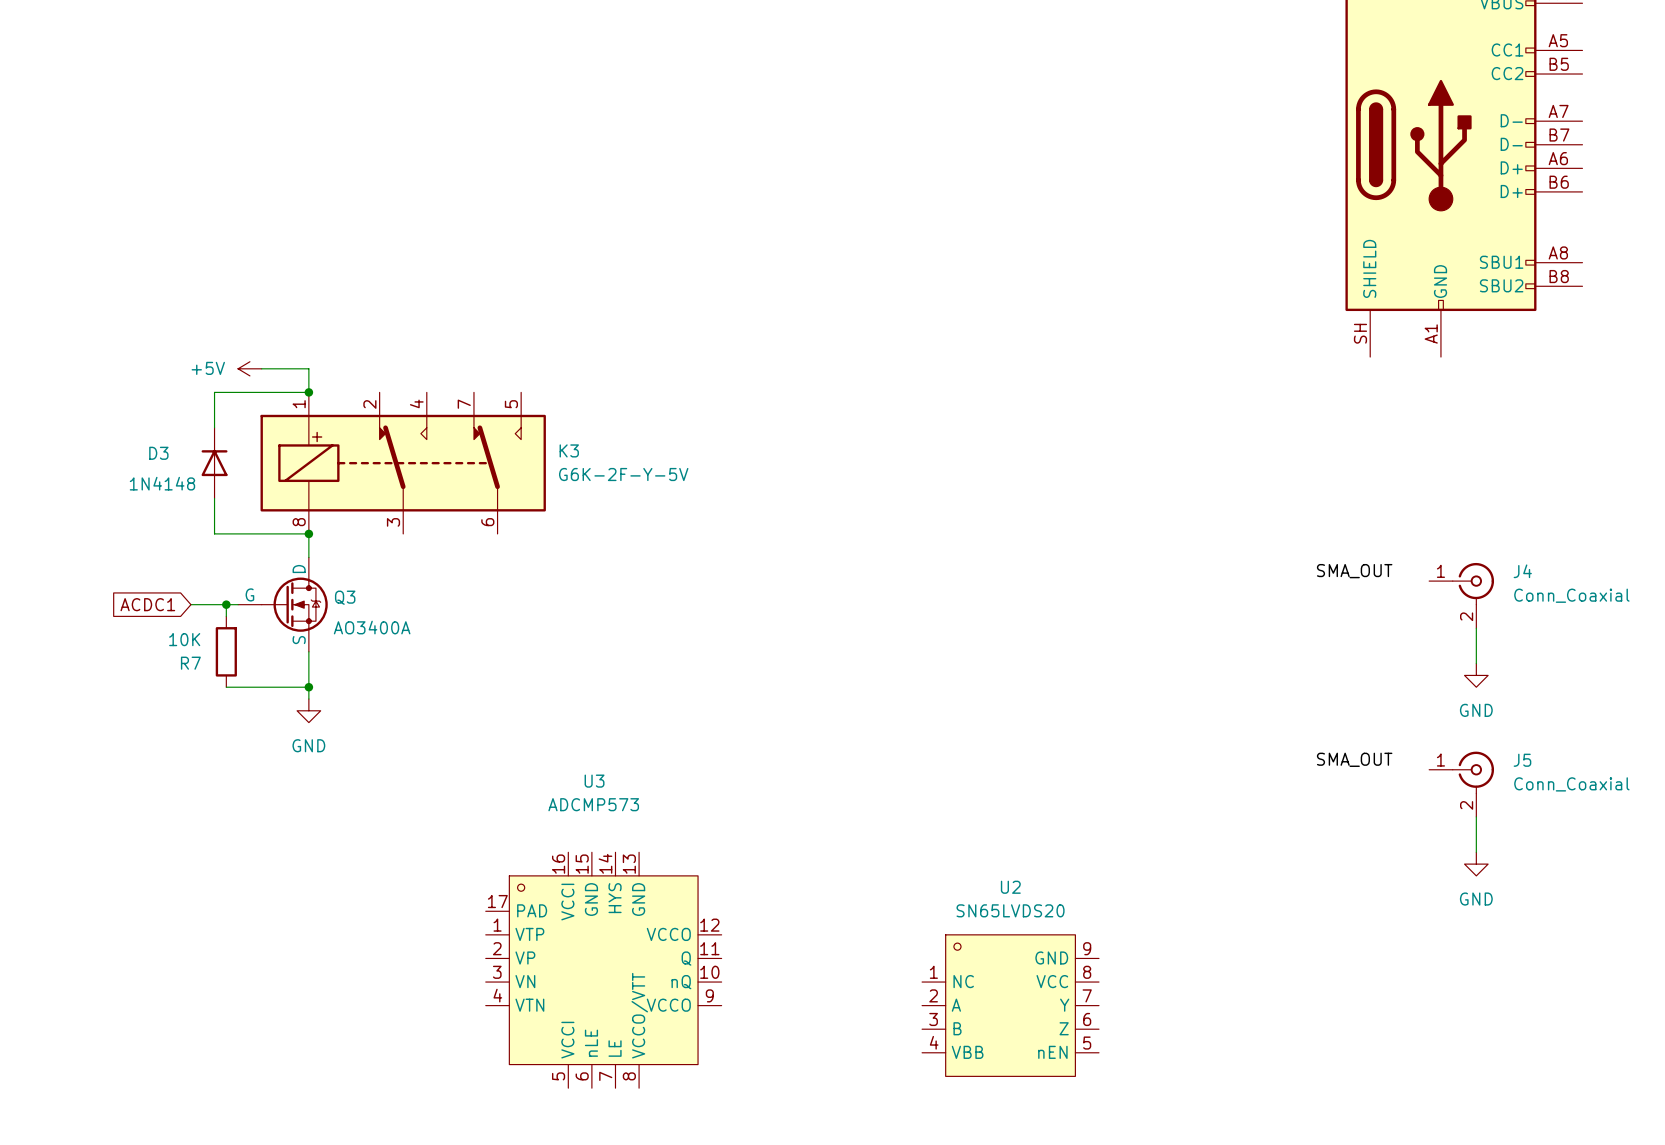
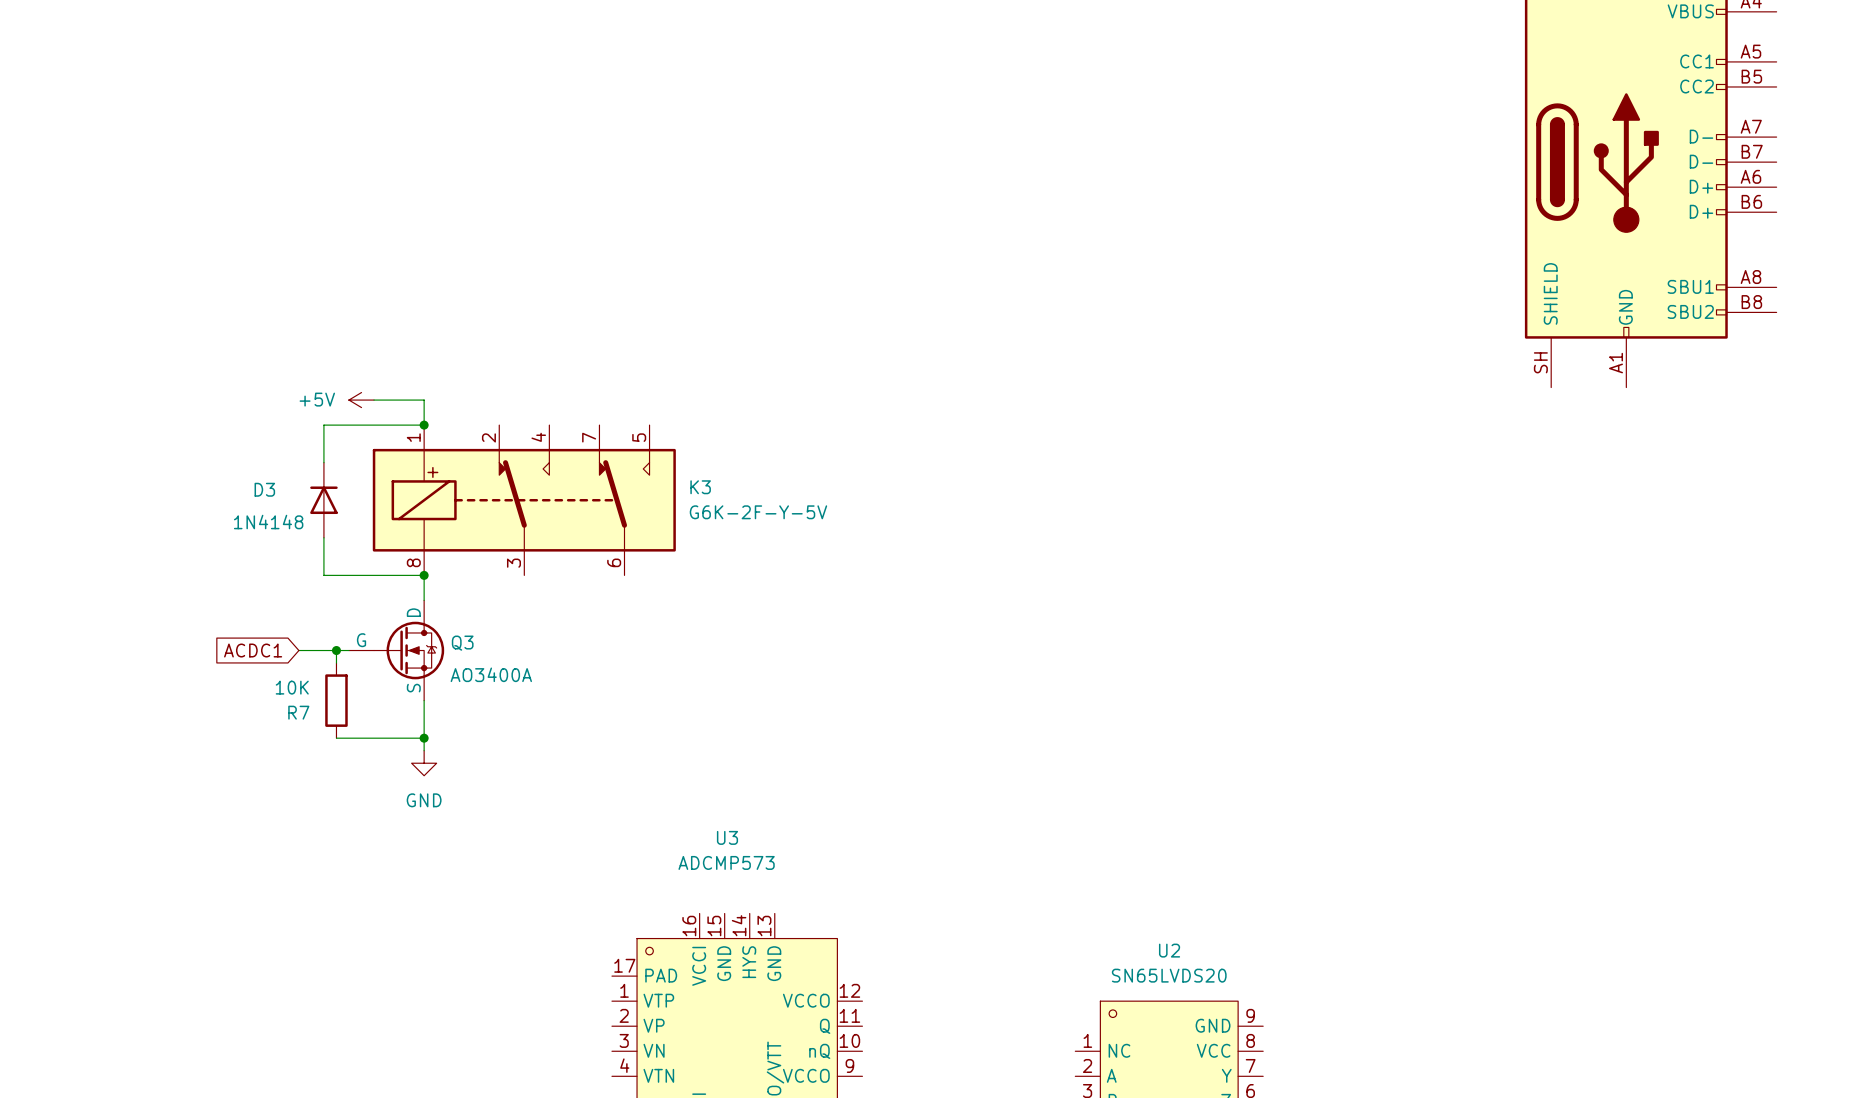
label: SMA_OUT (1354, 571) -> none
J4: Conn_Coaxial (1461, 595) -> none
wire: (1476, 628) (1476, 663) -> none
power symbol: GND (1476, 675) -> none
label: SMA_OUT (1354, 759) -> none
J5: Conn_Coaxial (1461, 784) -> none
wire: (1476, 816) (1476, 852) -> none
power symbol: GND (1476, 864) -> none

